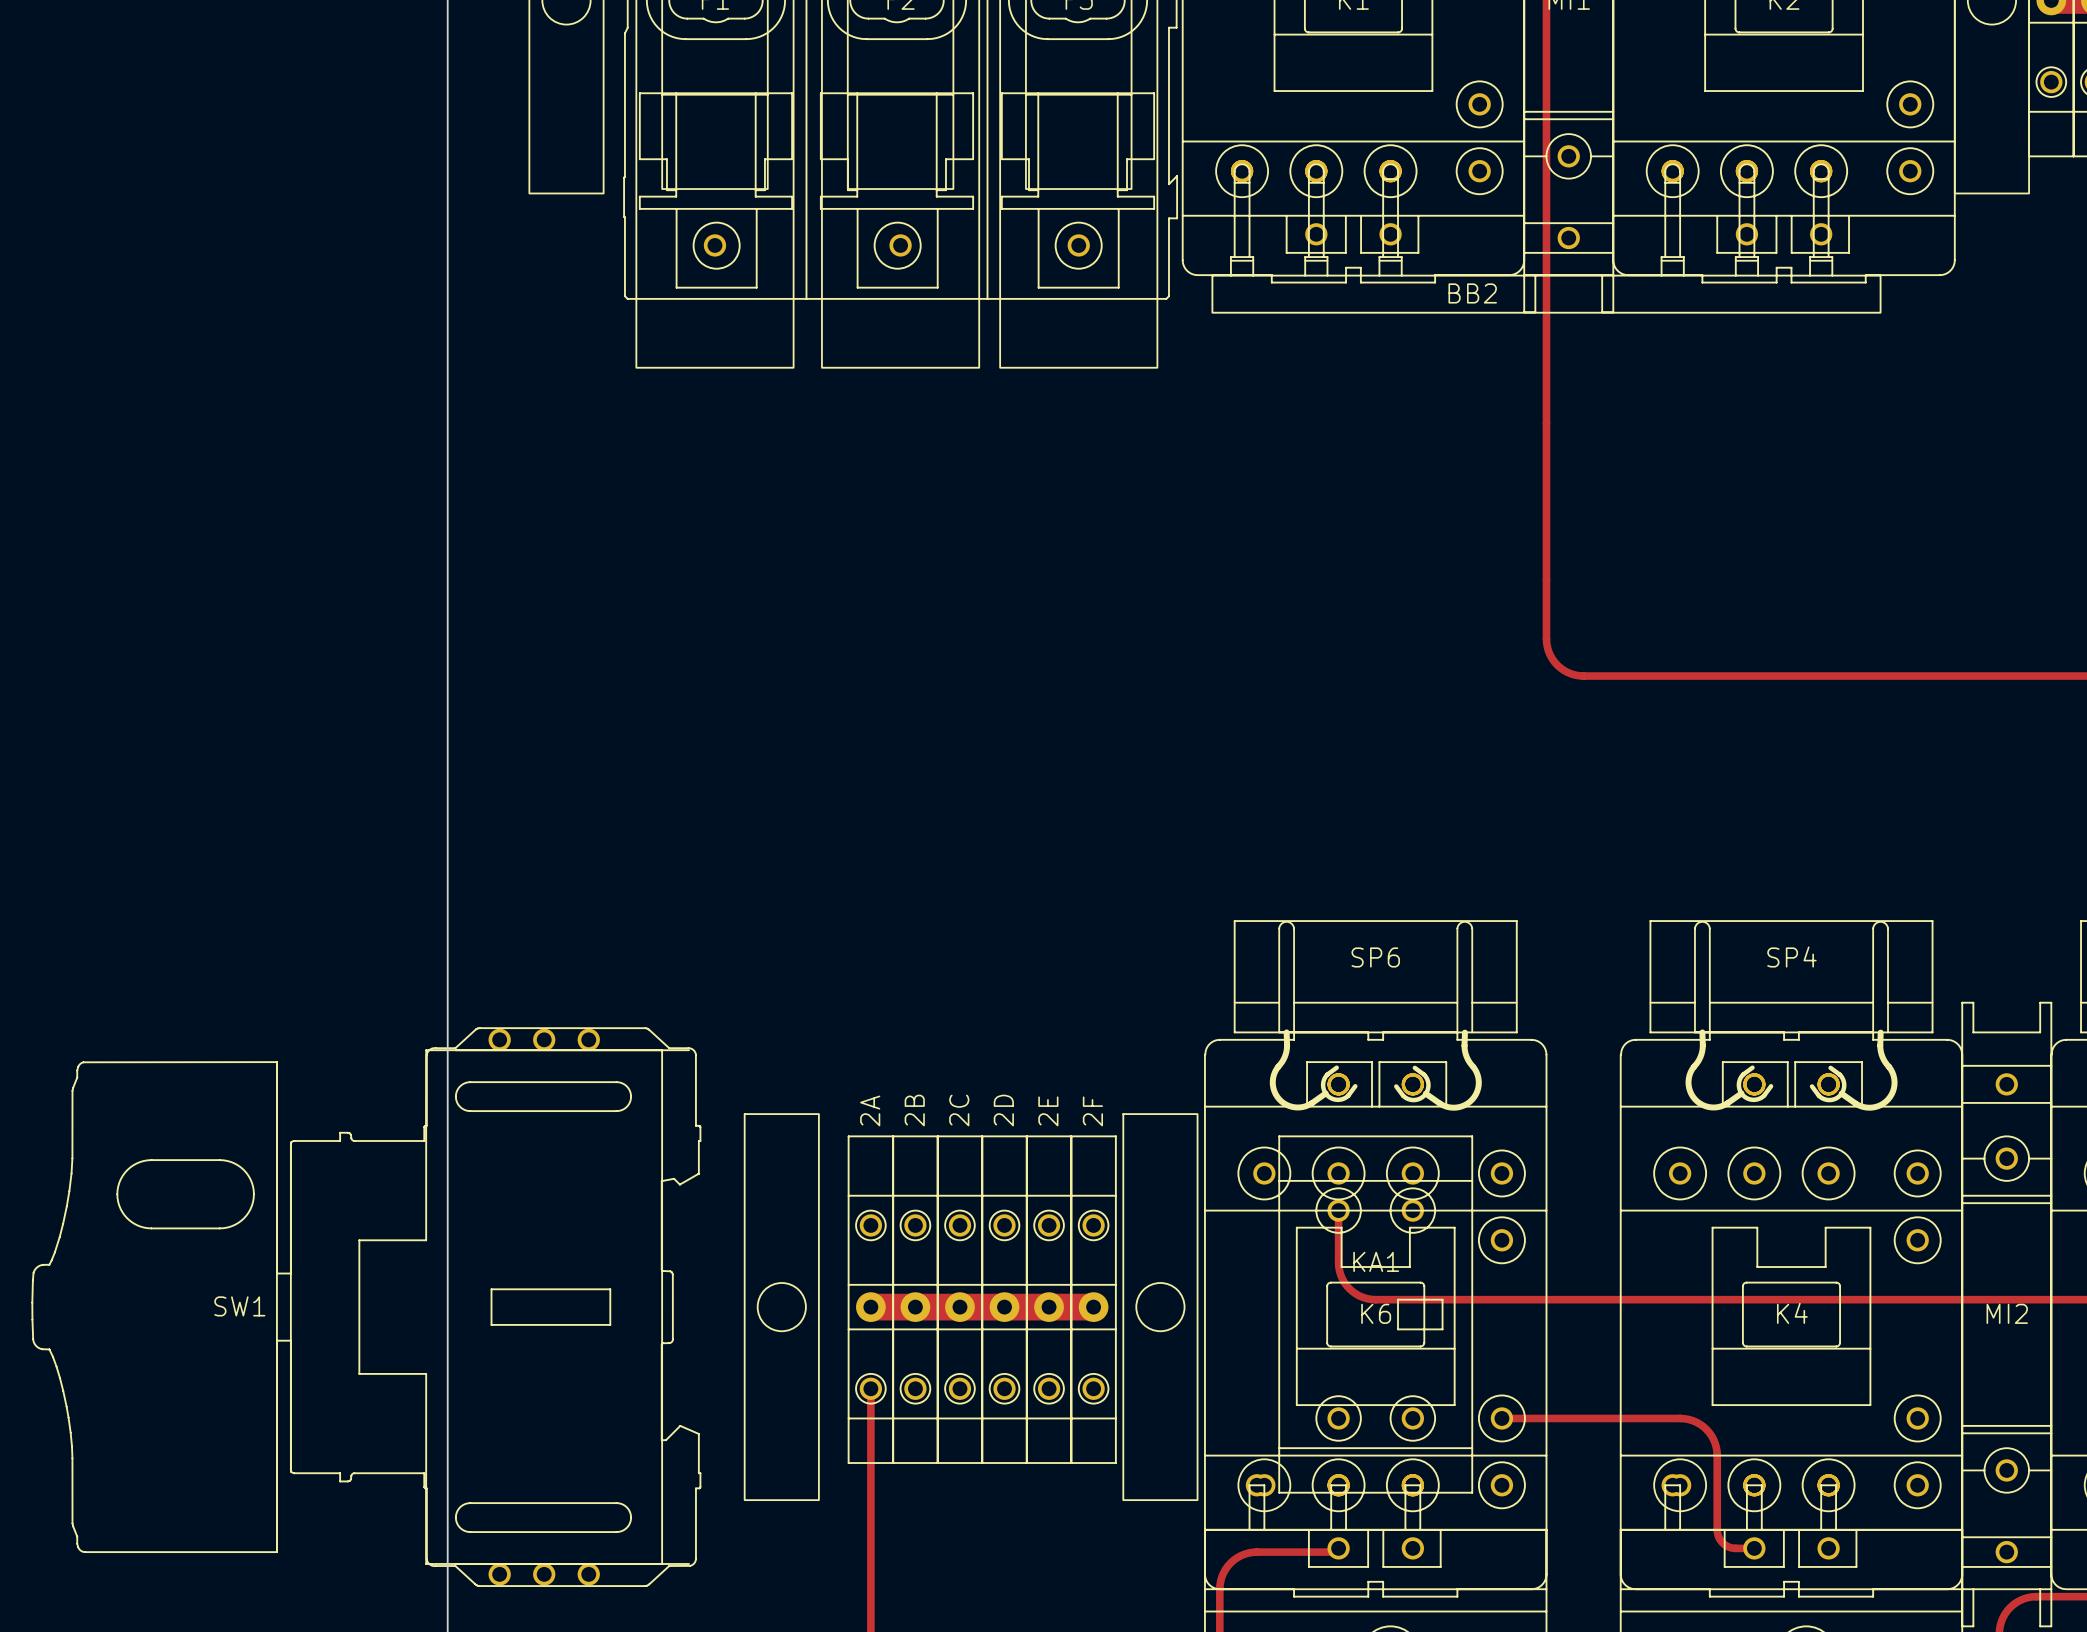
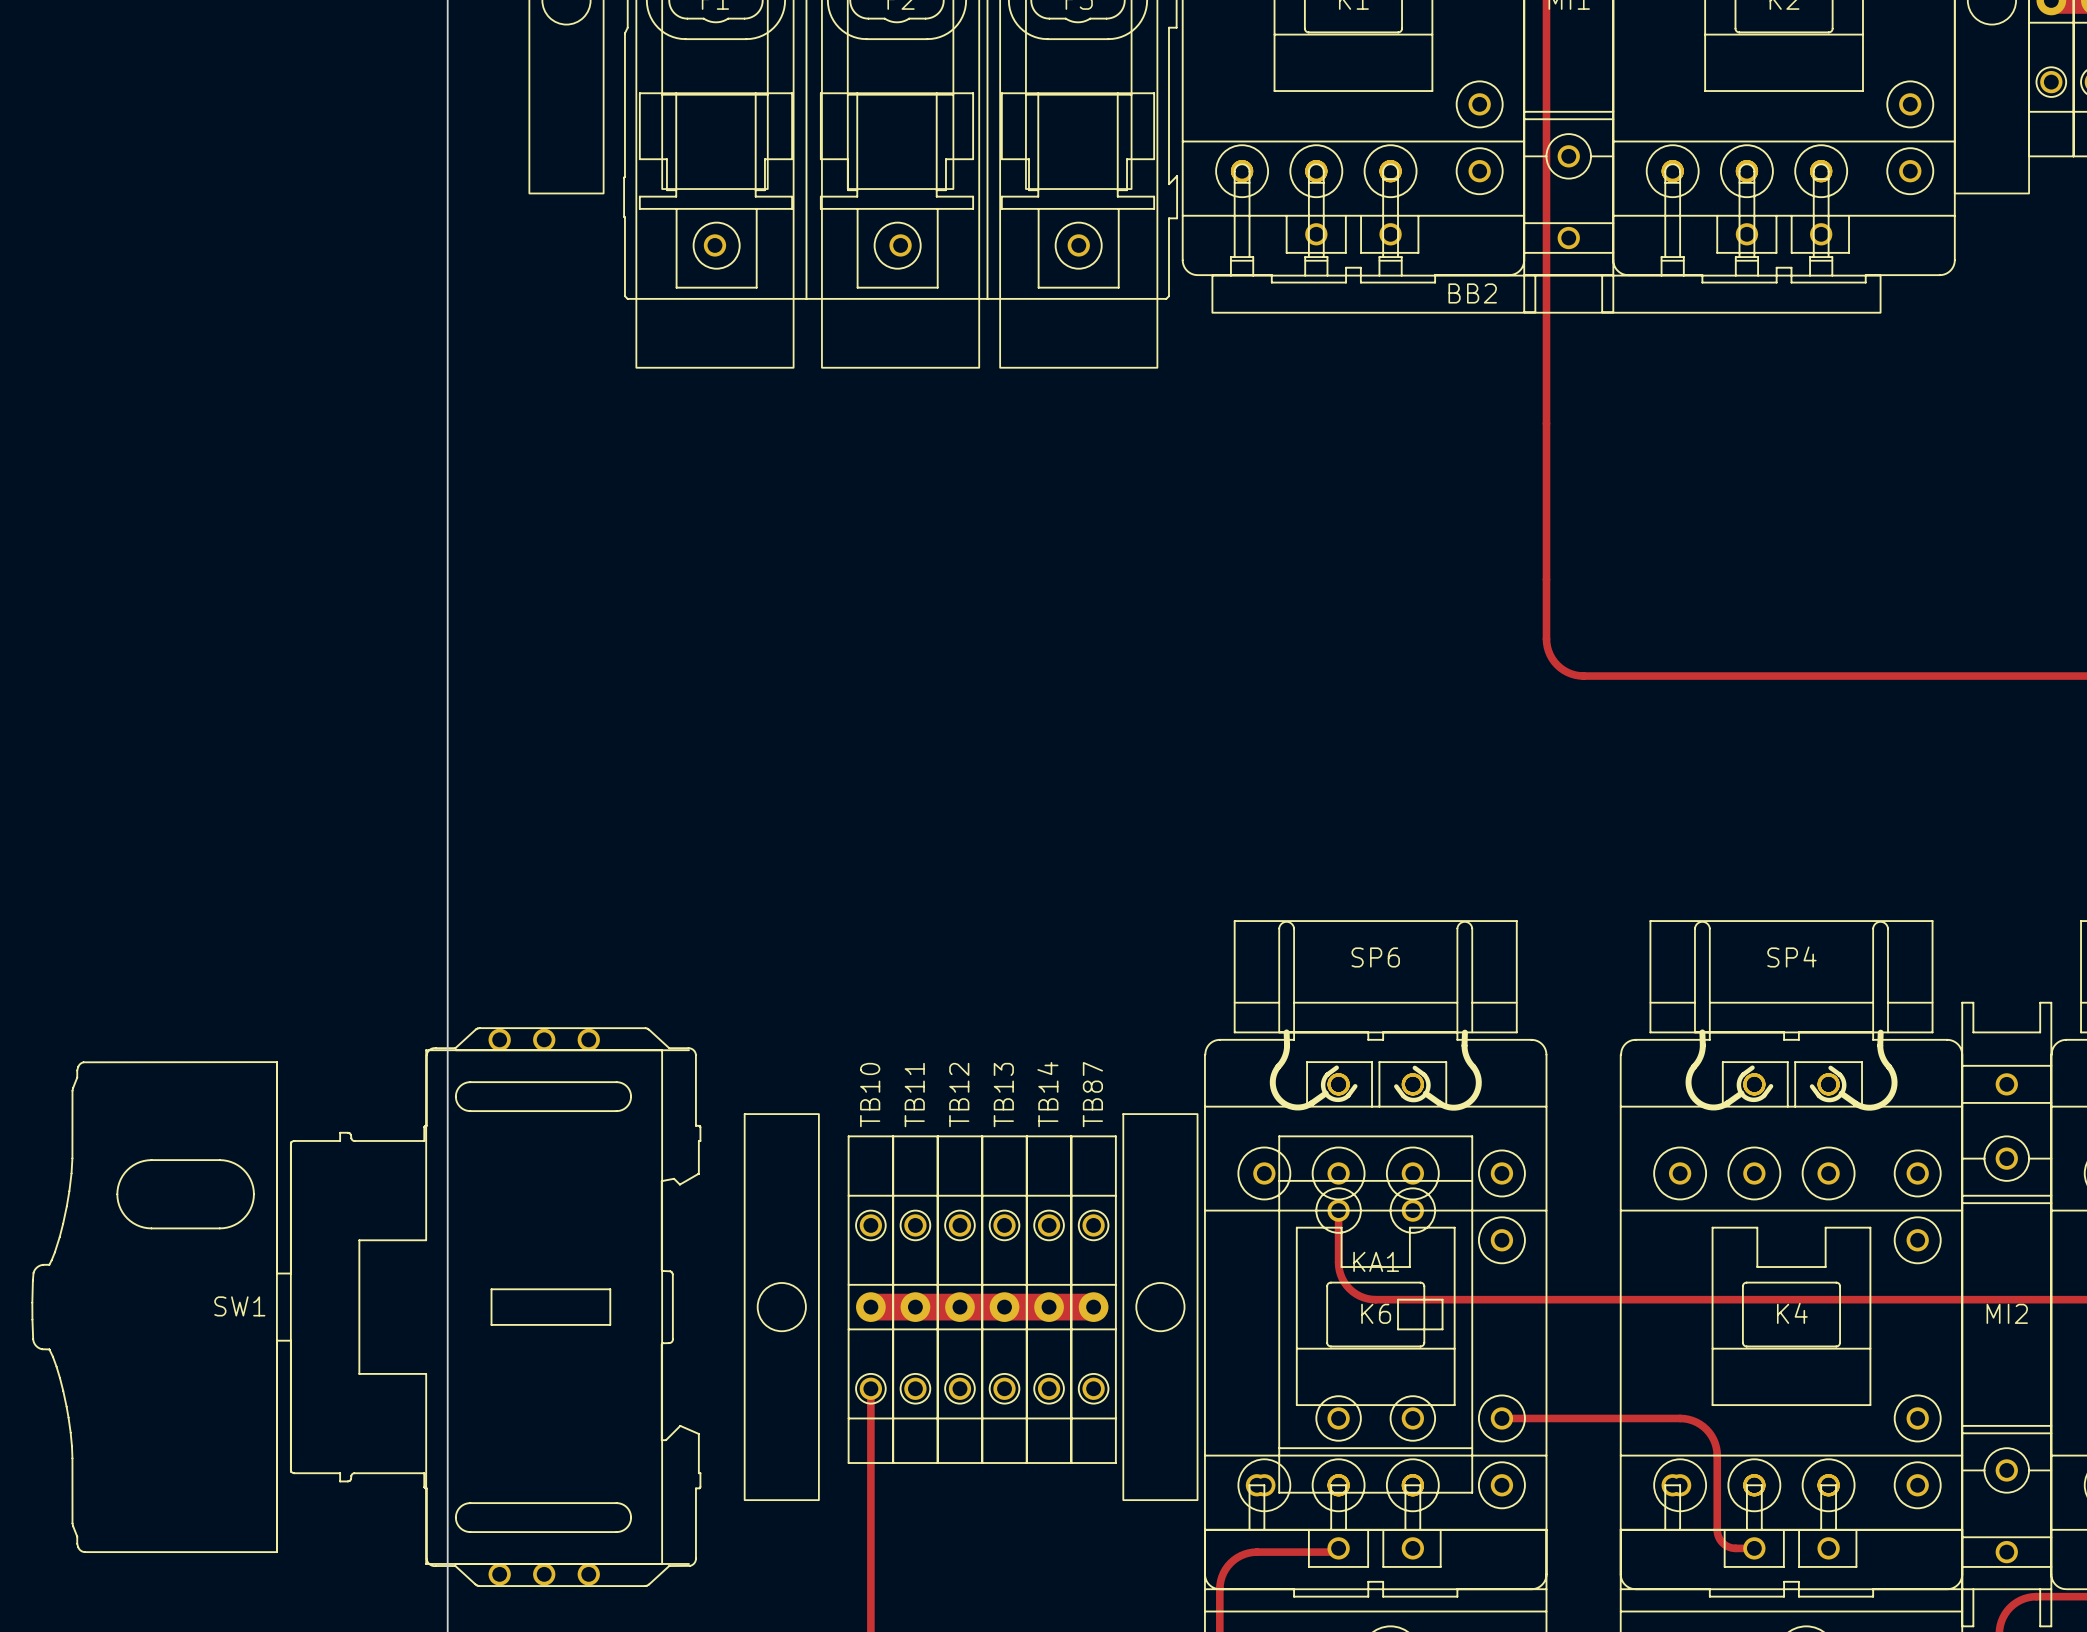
2A name: 2A (870, 1110) -> TB10 (870, 1095)
2B name: 2B (914, 1110) -> TB11 (914, 1095)
2C name: 2C (959, 1110) -> TB12 (959, 1095)
2D name: 2D (1003, 1110) -> TB13 (1003, 1095)
2E name: 2E (1048, 1111) -> TB14 (1047, 1094)
2F name: 2F (1092, 1111) -> TB87 (1092, 1094)

